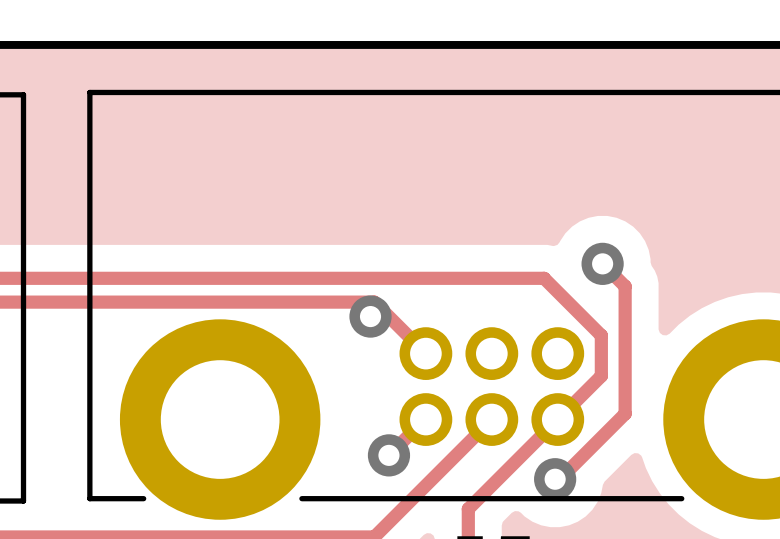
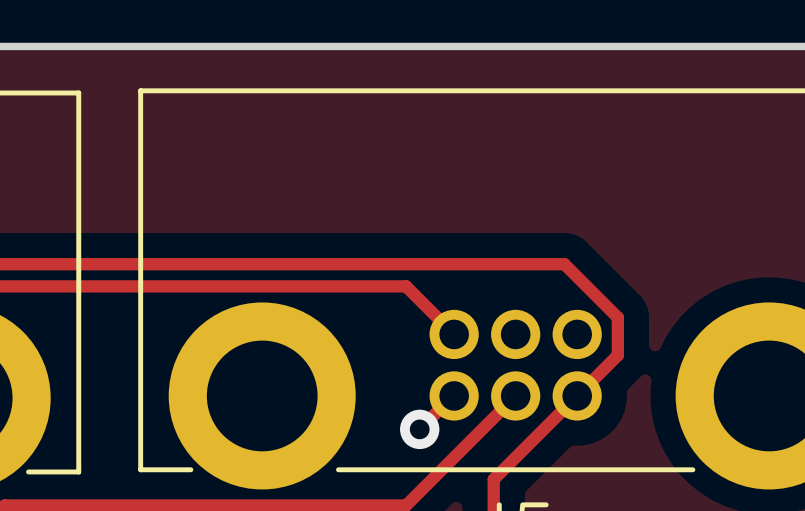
track: (602, 263) (625, 286) (625, 413) (559, 479) (555, 479) -> none
via: (602, 263) -> none
via: (370, 316) -> none
via: (555, 479) -> none

